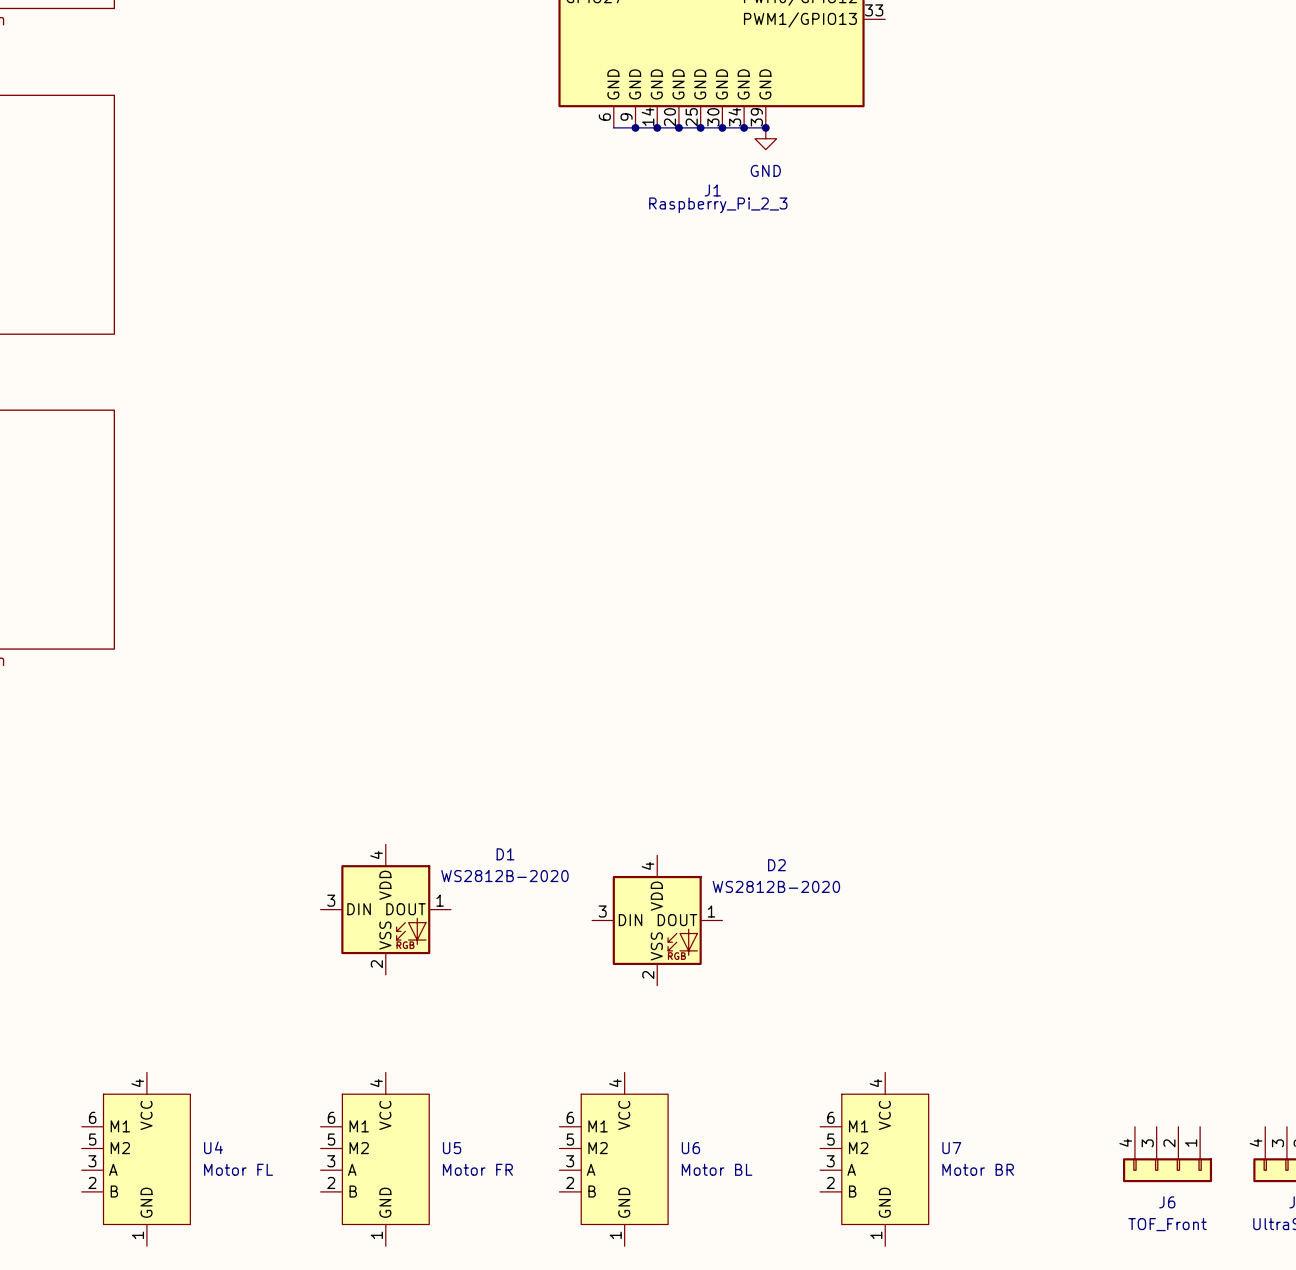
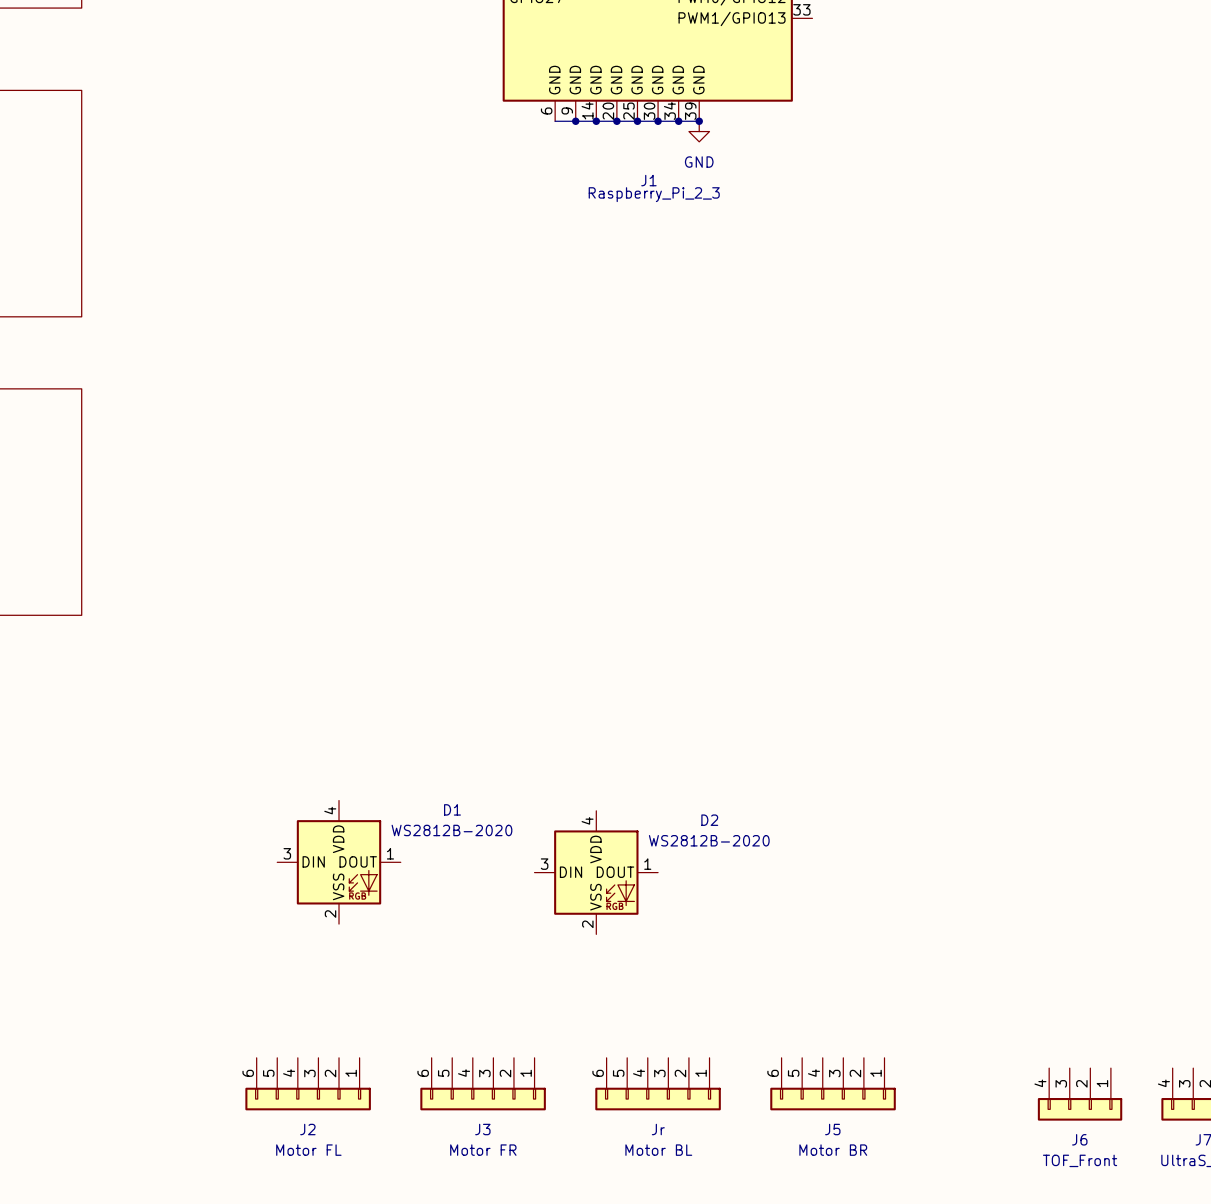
J2: none -> Motor FL (308, 1084)
J3: none -> Motor FR (483, 1084)
Jr: none -> Motor BL (658, 1084)
J5: none -> Motor BR (833, 1084)
U4: Motor FL (136, 1159) -> none
U5: Motor FR (374, 1159) -> none
U6: Motor BL (613, 1159) -> none
U7: Motor BR (874, 1159) -> none

